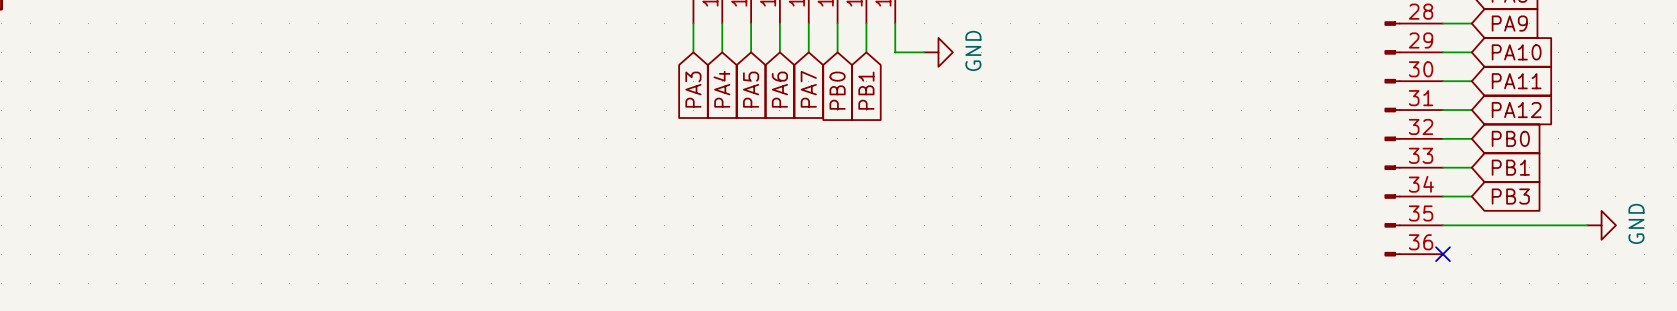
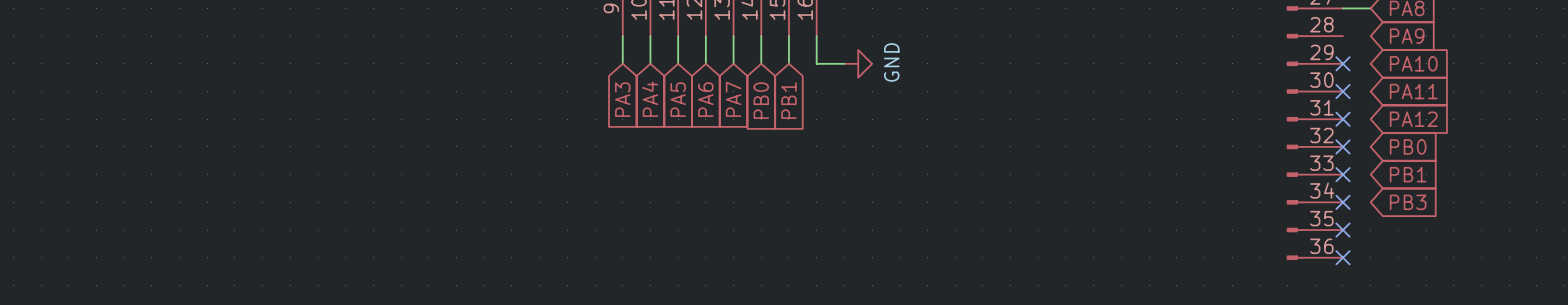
wire: (1443, 23) (1471, 23) -> none
wire: (1443, 52) (1471, 52) -> none
no-connect mark: none -> (1342, 63)
wire: (1443, 81) (1471, 81) -> none
no-connect mark: none -> (1342, 91)
wire: (1443, 110) (1471, 110) -> none
no-connect mark: none -> (1342, 119)
wire: (1443, 138) (1471, 138) -> none
no-connect mark: none -> (1342, 146)
wire: (1443, 167) (1471, 167) -> none
no-connect mark: none -> (1342, 174)
wire: (1443, 196) (1471, 196) -> none
no-connect mark: none -> (1342, 202)
wire: (1443, 225) (1587, 225) -> none
no-connect mark: none -> (1342, 230)
power symbol: GND (1601, 225) -> none

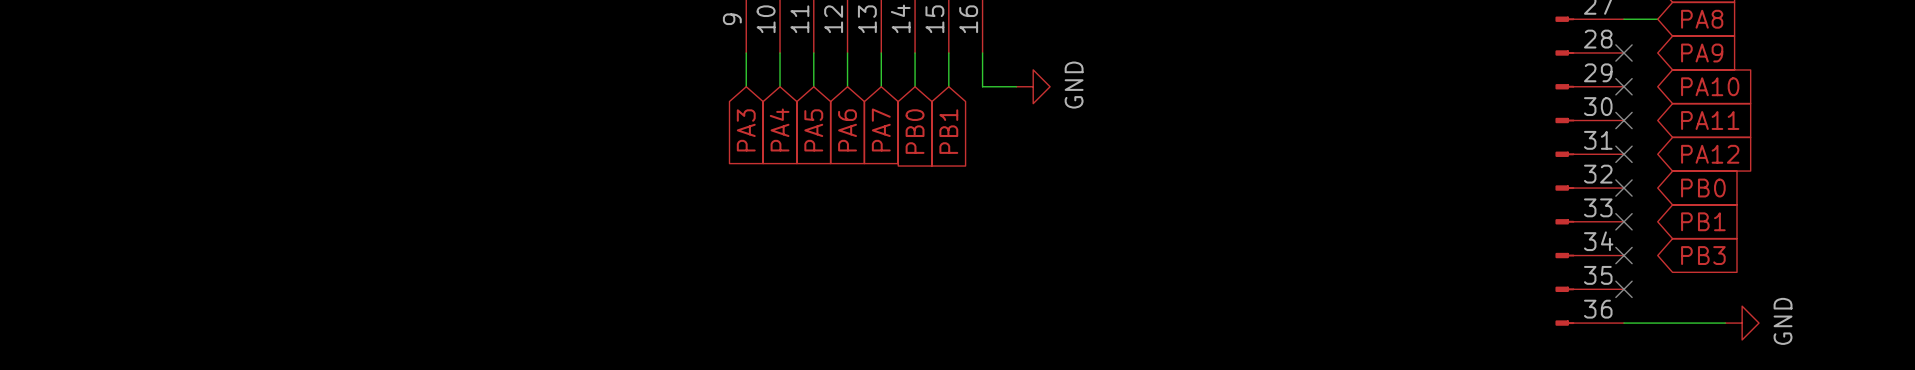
no-connect mark: none -> (1623, 53)
wire: none -> (1623, 323) (1725, 323)
no-connect mark: (1342, 257) -> none
power symbol: none -> GND (1742, 323)

